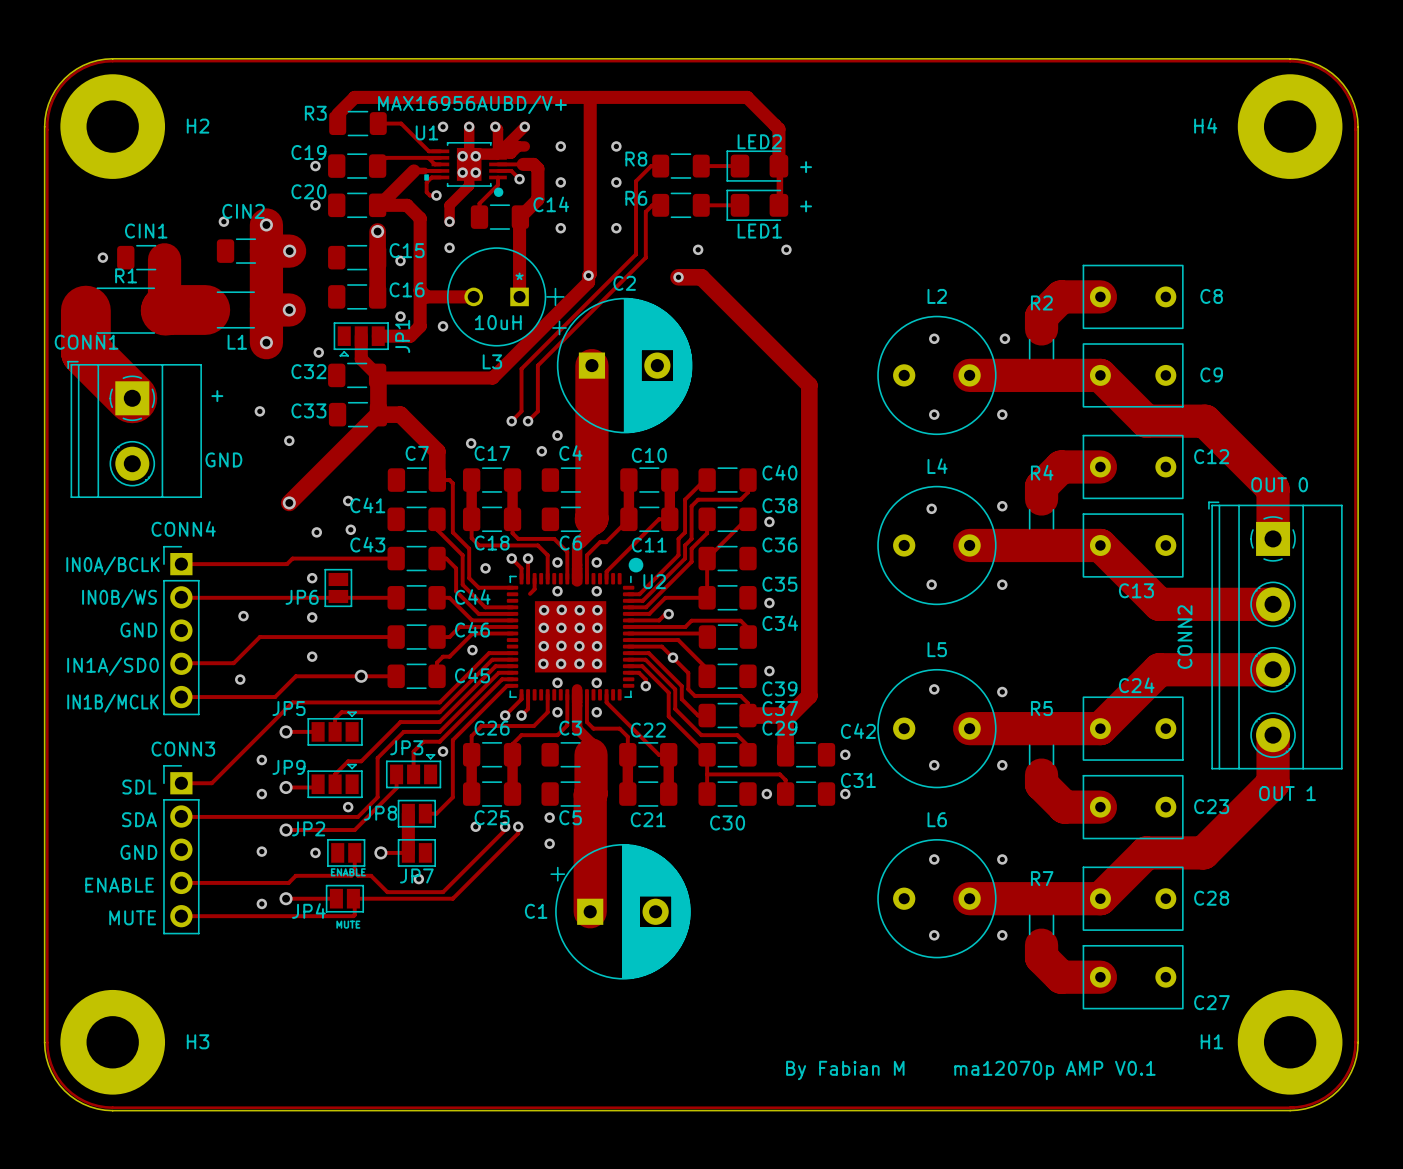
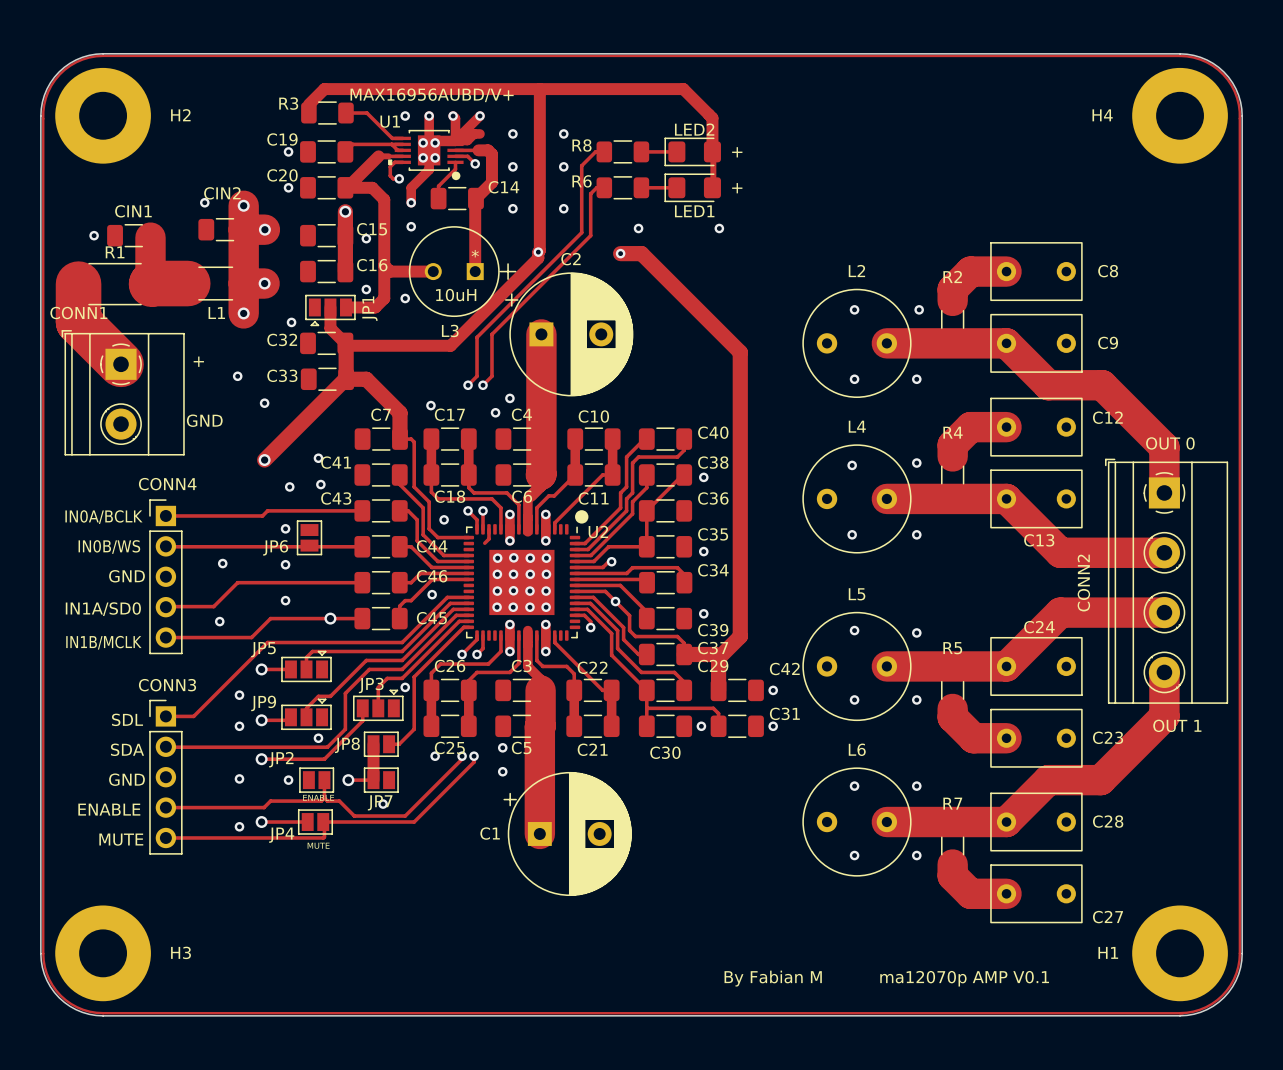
track: none -> (509, 514) (509, 540)
track: none -> (545, 514) (545, 540)
track: none -> (509, 624) (509, 651)
track: none -> (545, 624) (545, 651)

